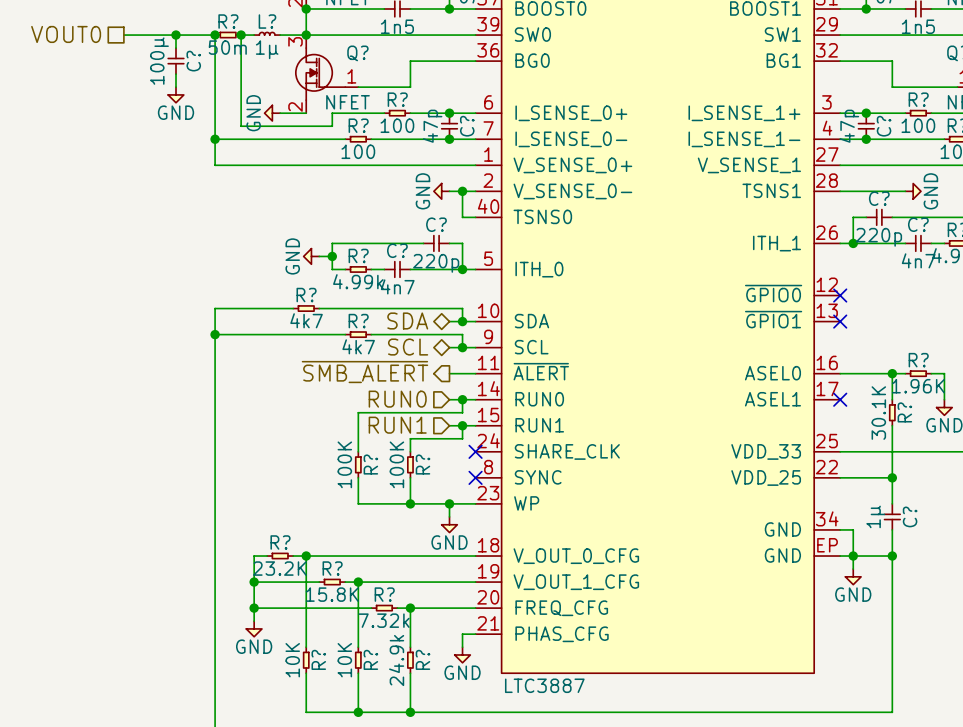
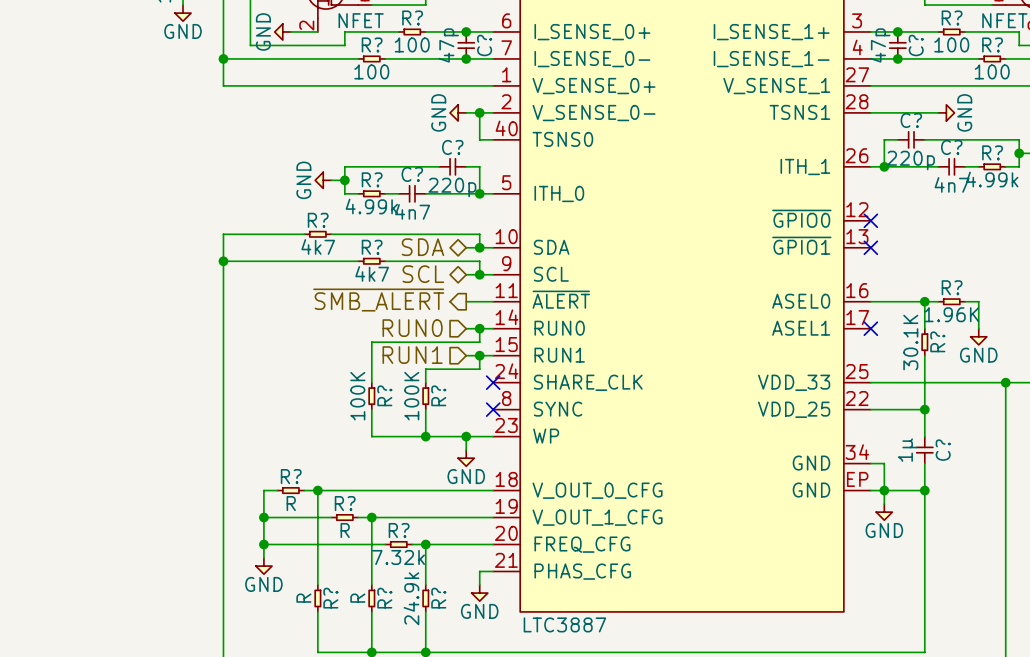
R? value: 23.2K (279, 568) -> R (291, 503)
R? value: 15.8K (332, 594) -> R (345, 530)
R? value: 10K (292, 660) -> R (303, 598)
R? value: 10K (344, 660) -> R (357, 598)

